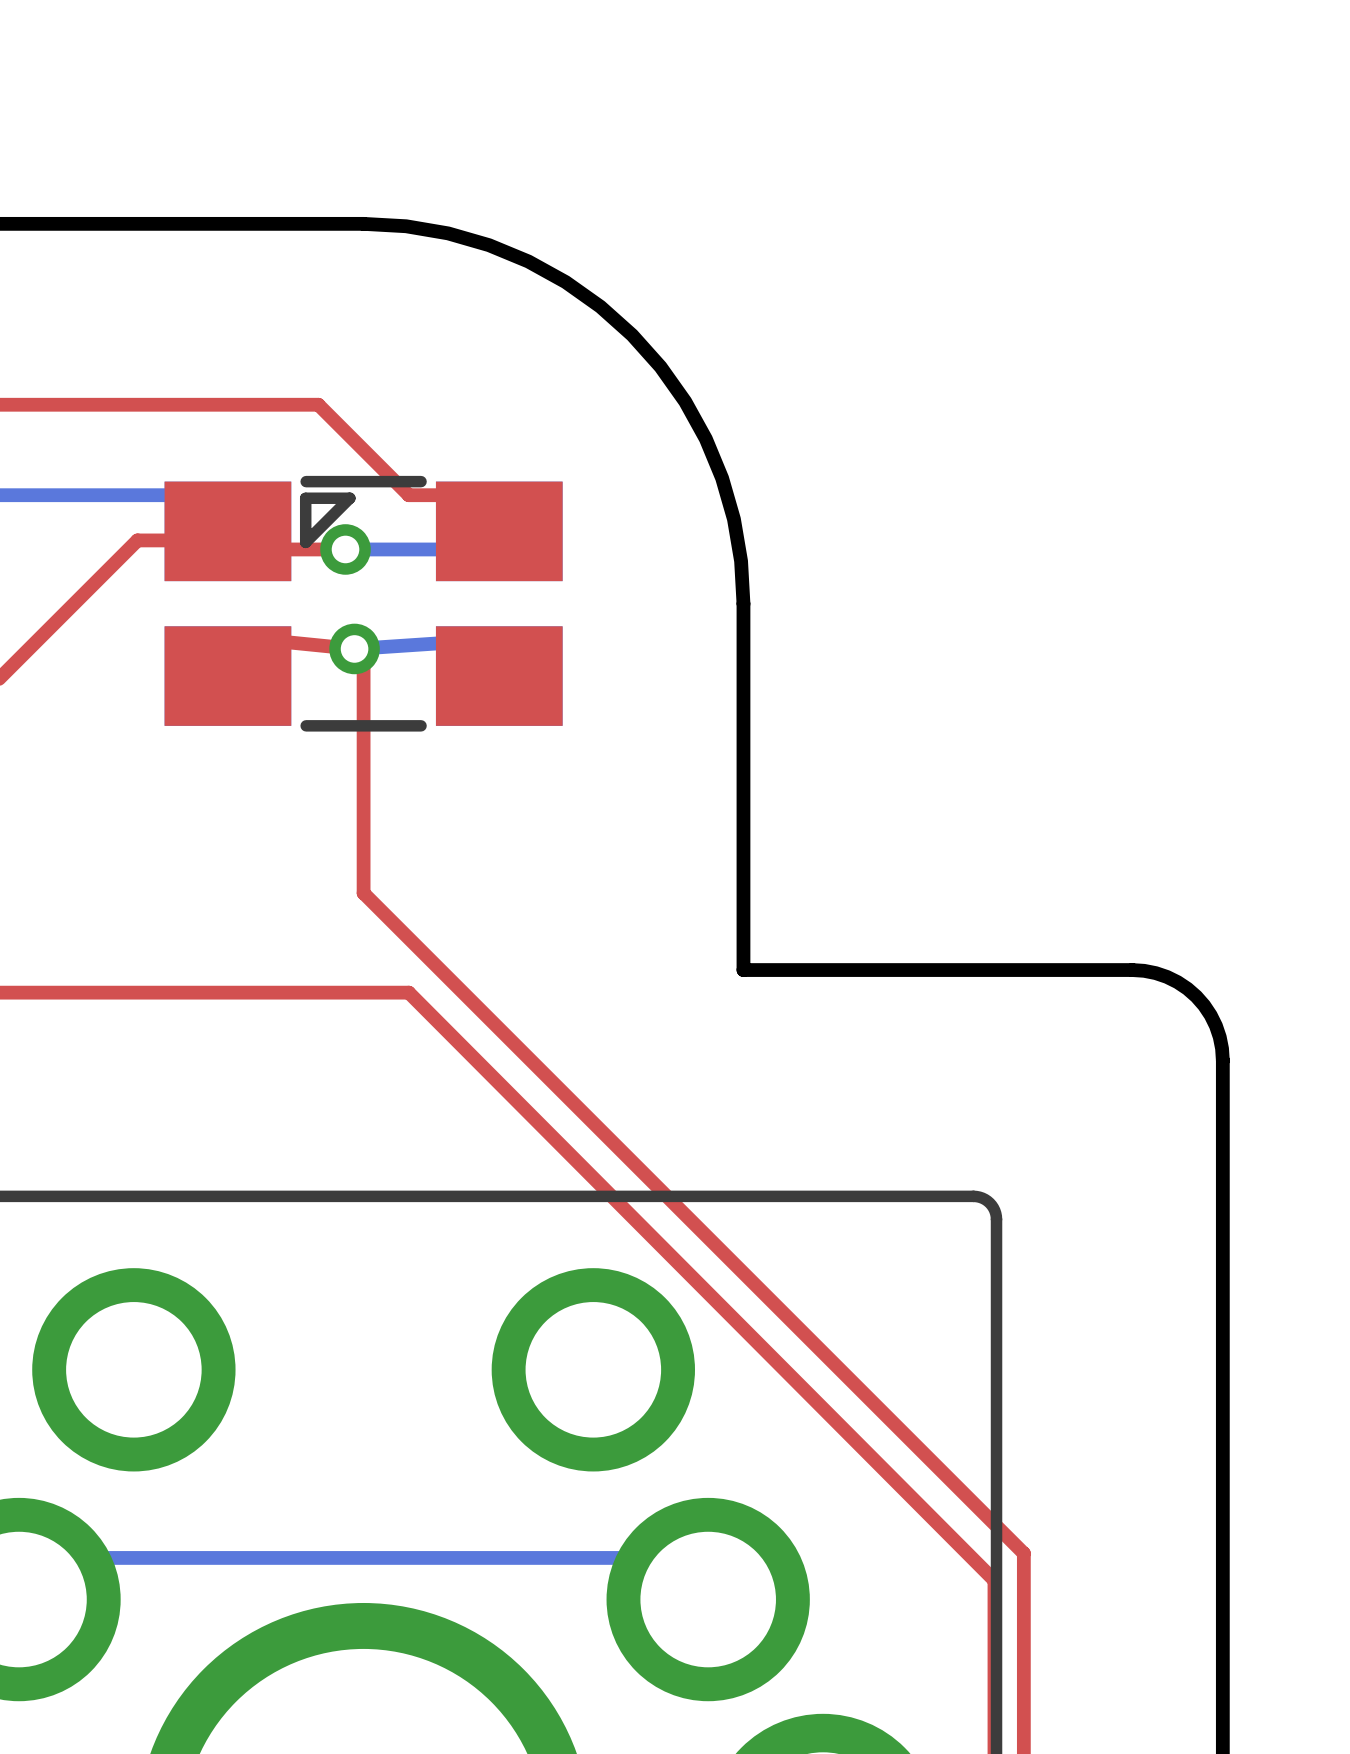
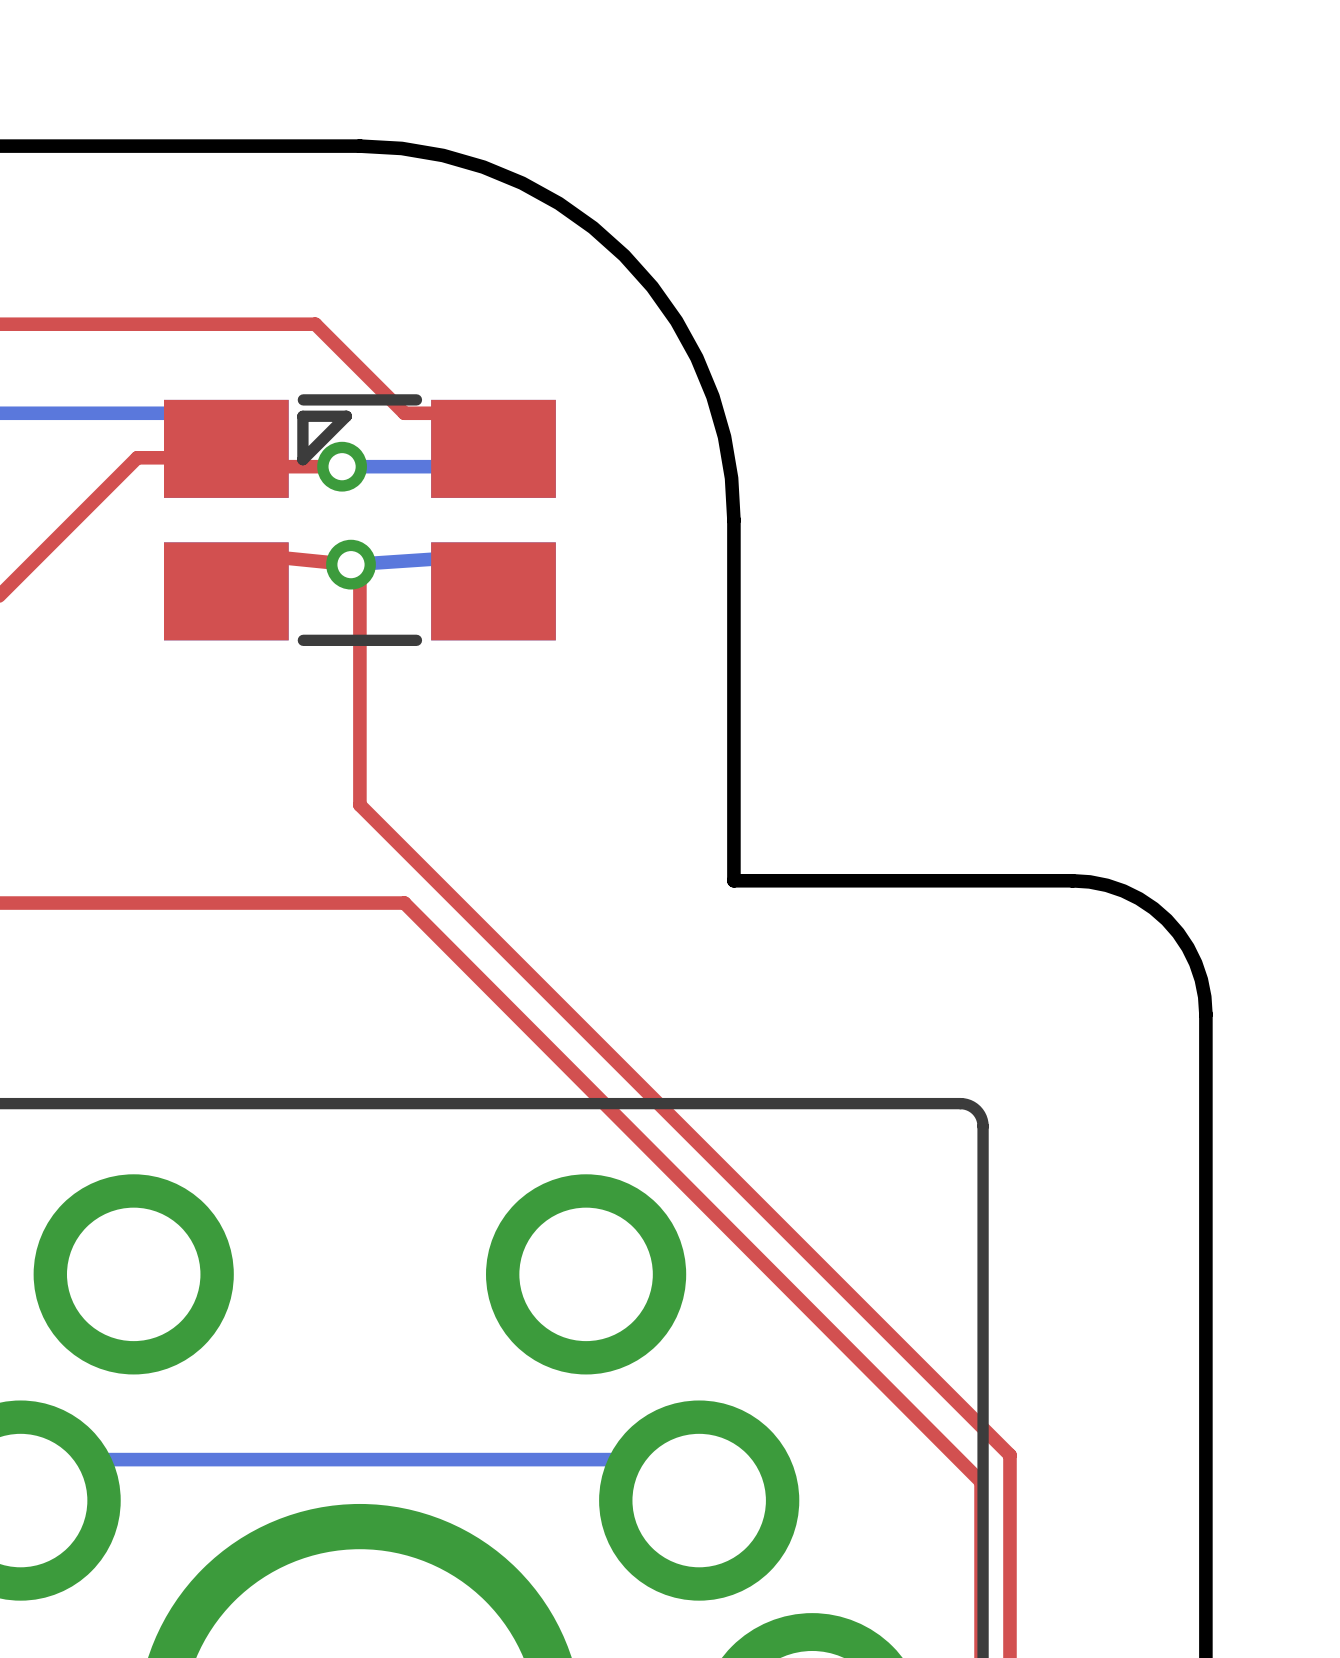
board edge: (1087, 970) (1132, 970) (1155, 973) (1177, 982) (1196, 996) (1210, 1015) (1219, 1037) (1222, 1060) (1222, 1105) -> (1072, 880) (1089, 881) (1123, 890) (1139, 898) (1166, 919) (1187, 947) (1195, 963) (1204, 996) (1205, 1014)

